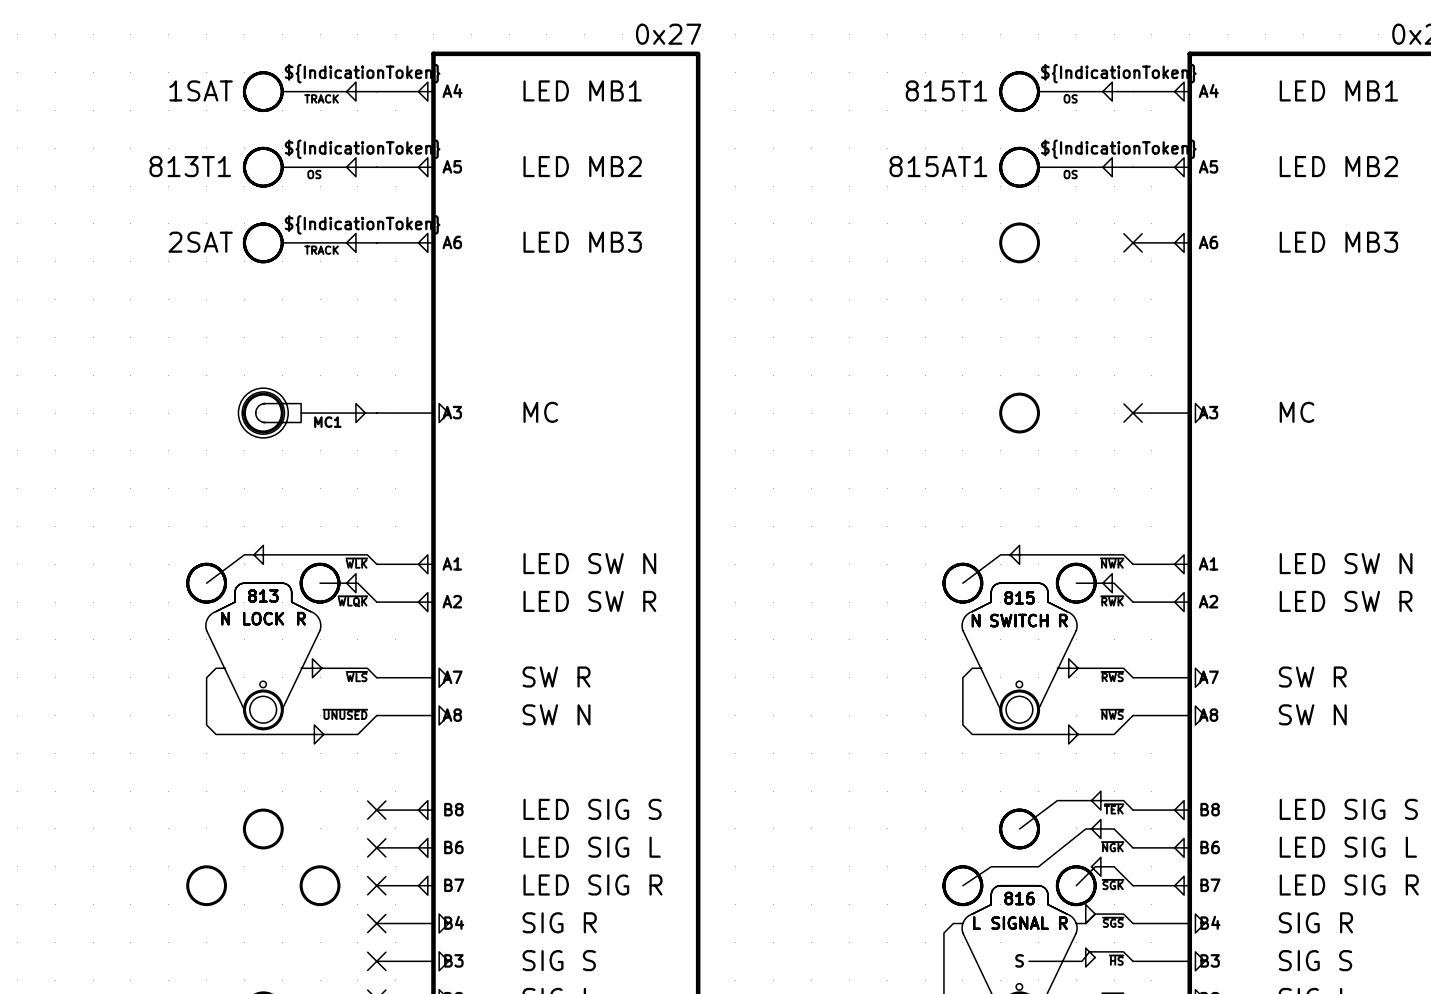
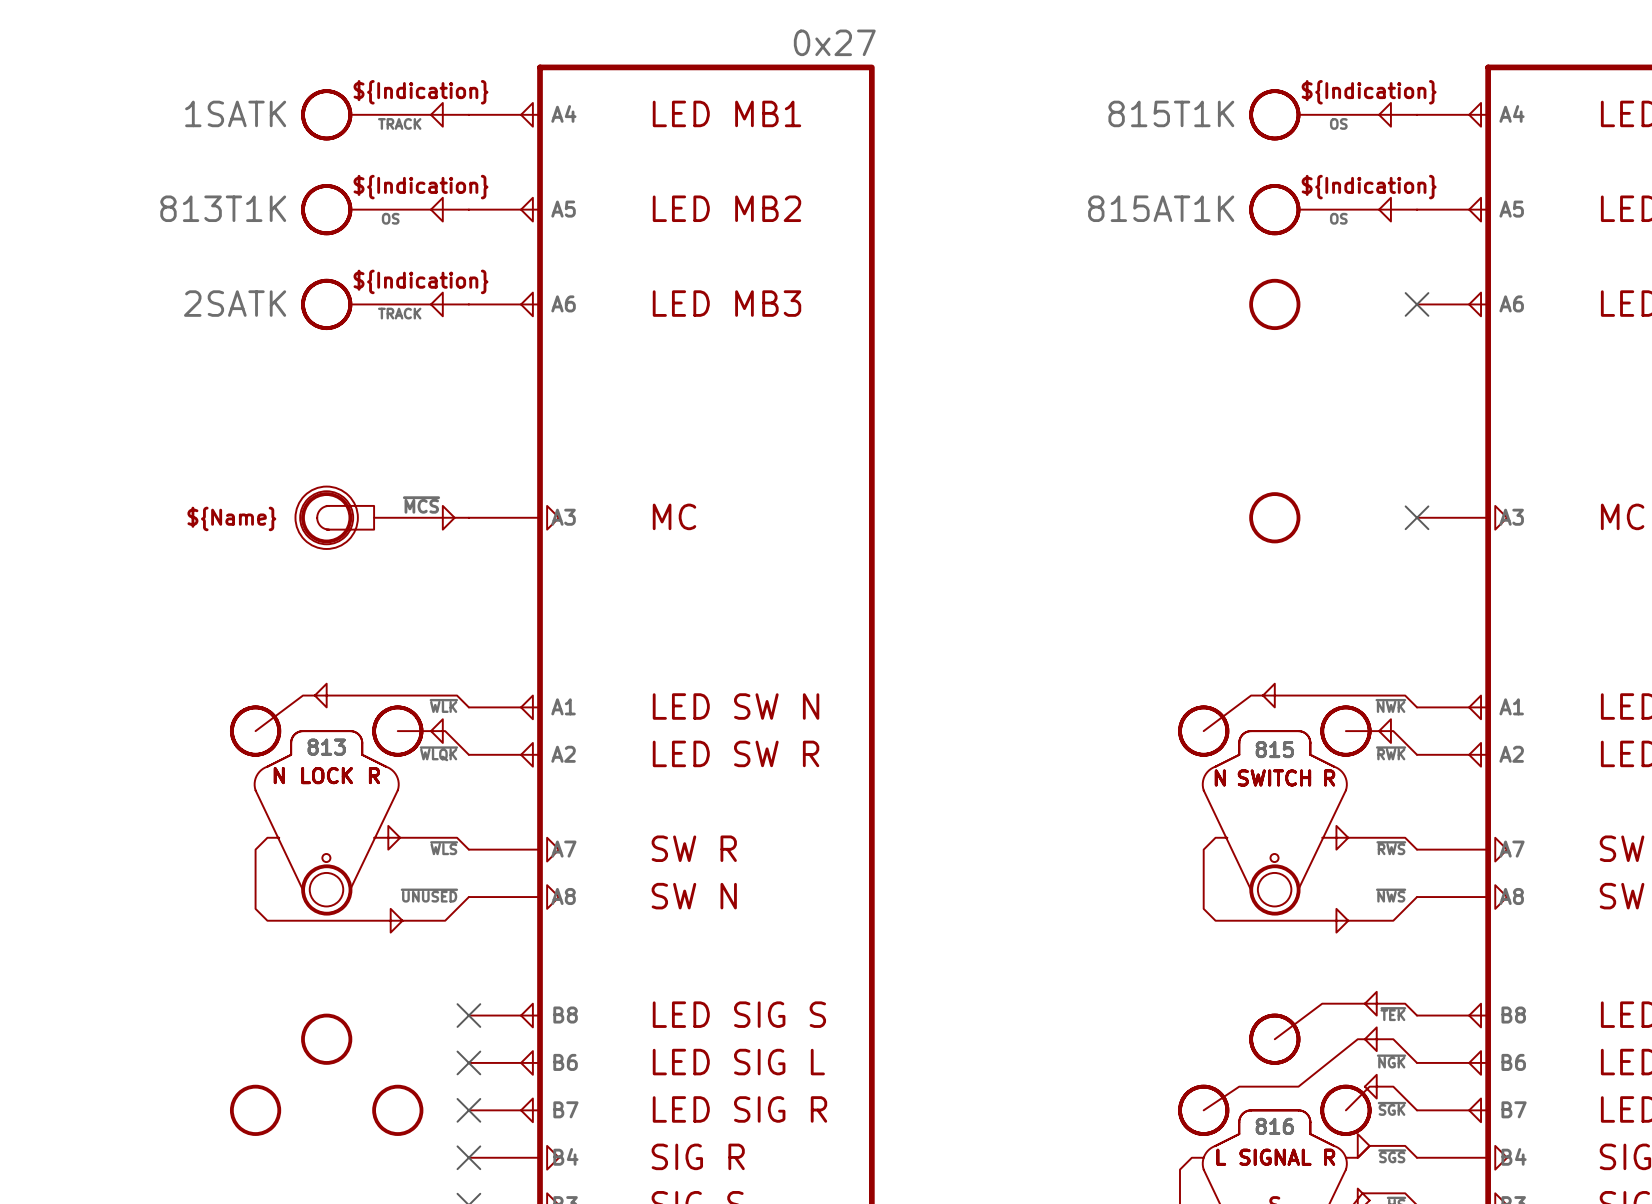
part text: ${IndicationToken} (362, 73) -> ${Indication} (420, 92)
part text: ${IndicationToken} (1118, 73) -> ${Indication} (1369, 92)
part text: none -> 1SATK (235, 113)
part text: 1SAT (201, 90) -> none
part text: none -> 815T1K (1171, 113)
part text: 815T1 (946, 90) -> none
part text: ${IndicationToken} (362, 149) -> ${Indication} (420, 187)
part text: ${IndicationToken} (1118, 149) -> ${Indication} (1369, 187)
part text: none -> 813T1K (223, 208)
part text: 813T1 (190, 166) -> none
part text: none -> 815AT1K (1161, 208)
part text: 815AT1 (938, 166) -> none
part text: ${IndicationToken} (362, 224) -> ${Indication} (420, 281)
part text: none -> 2SATK (235, 303)
part text: 2SAT (200, 242) -> none
part pin name: none -> ~{MCS} (421, 504)
part text: none -> ${Name} (231, 518)
part value: MC1 (327, 422) -> none

